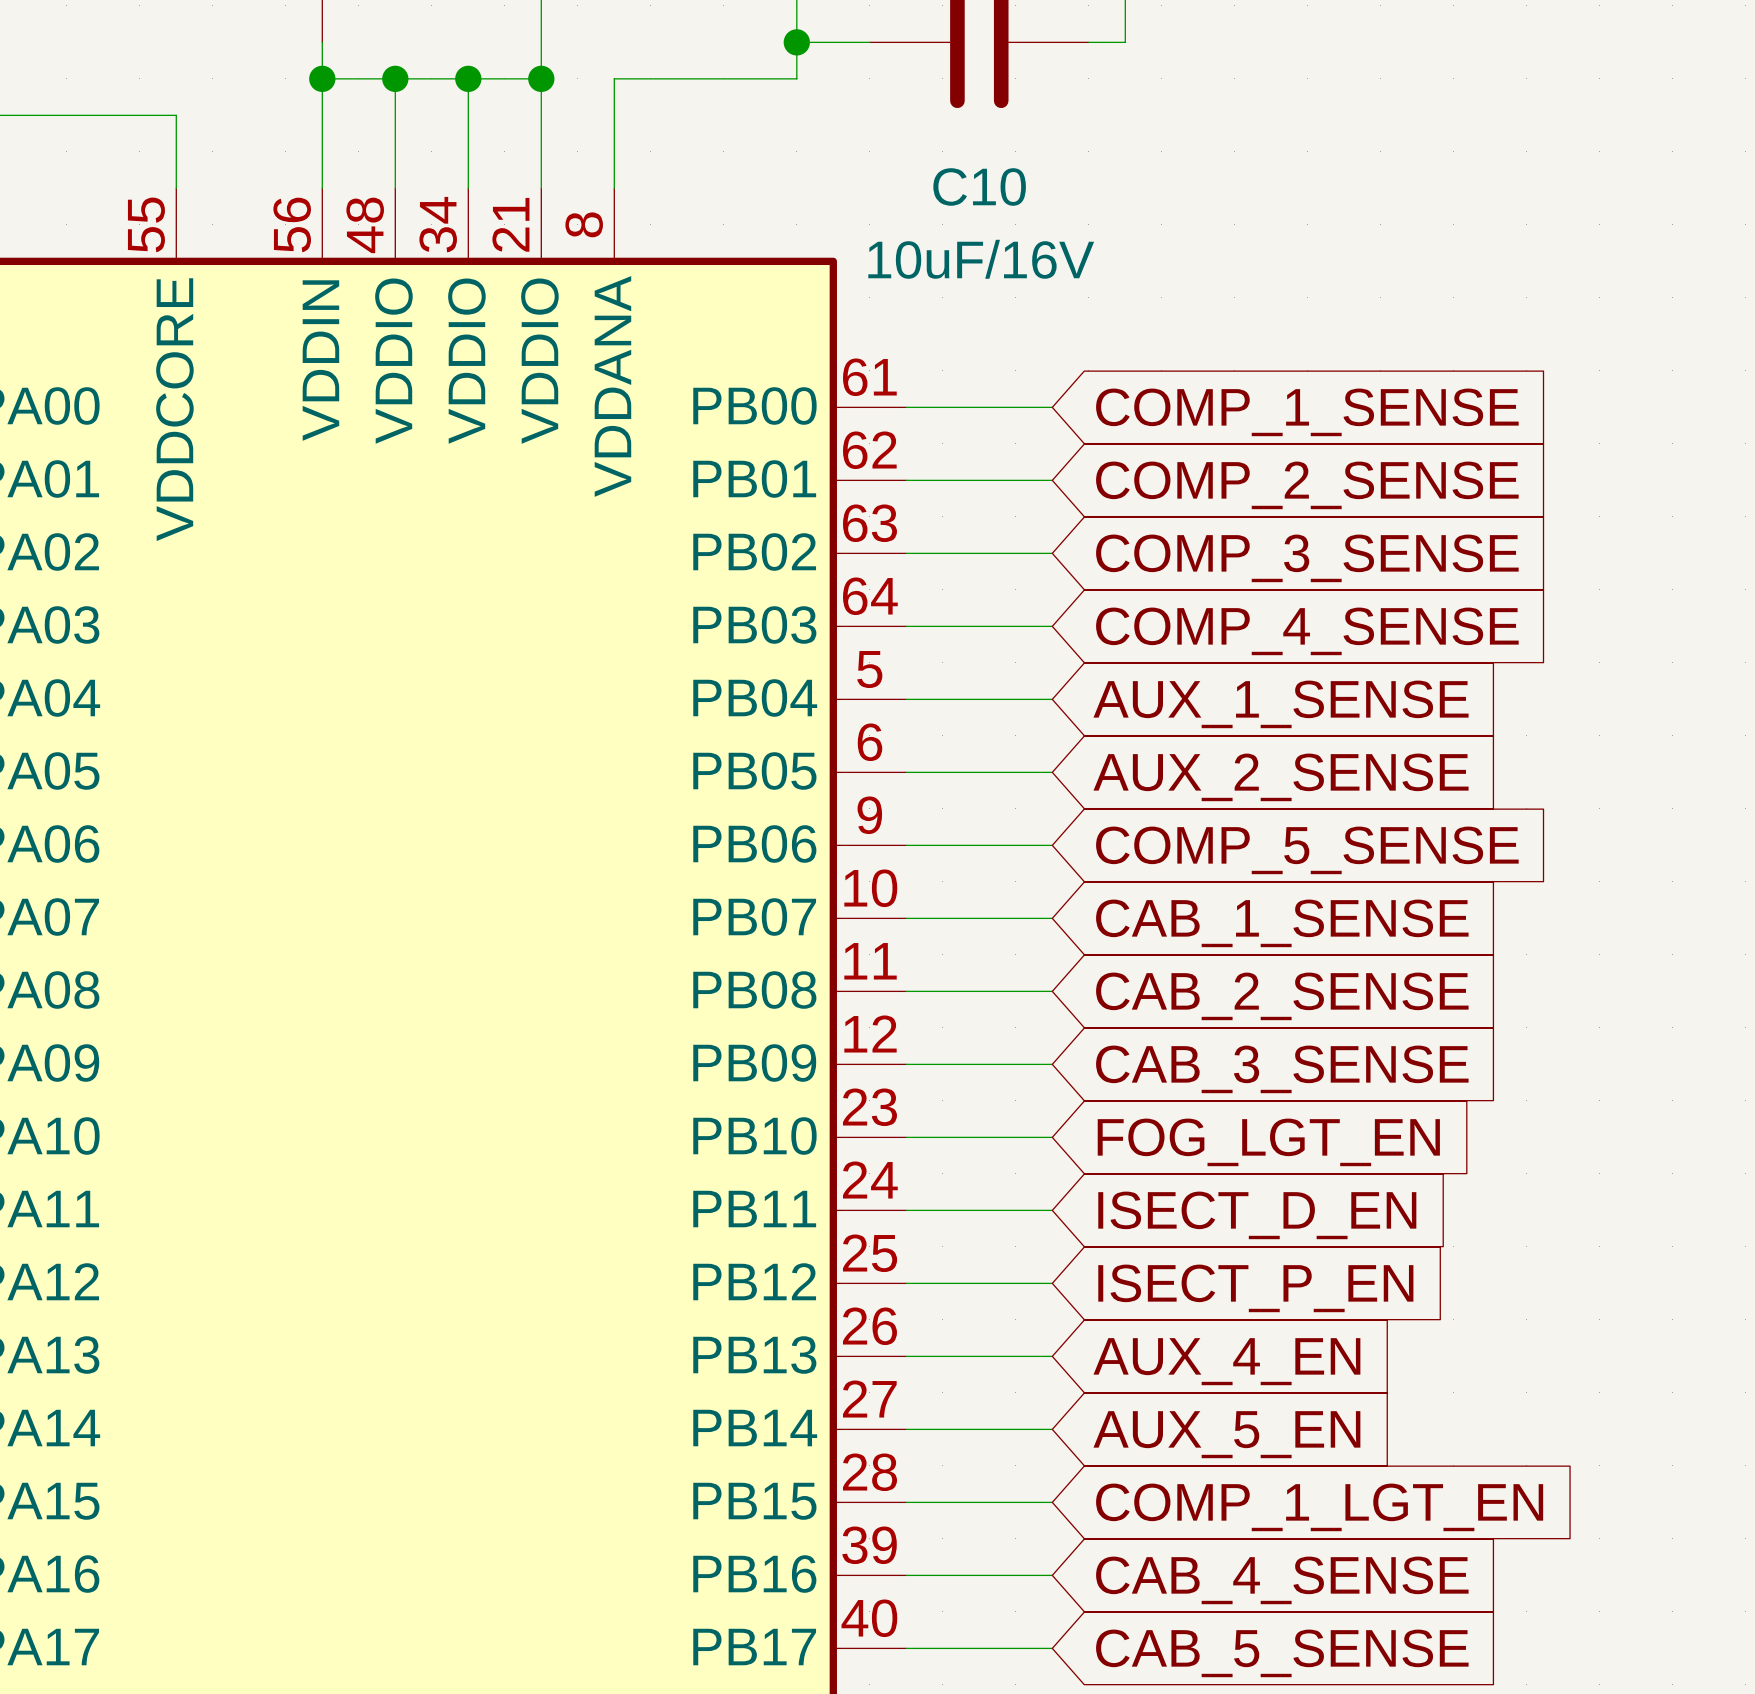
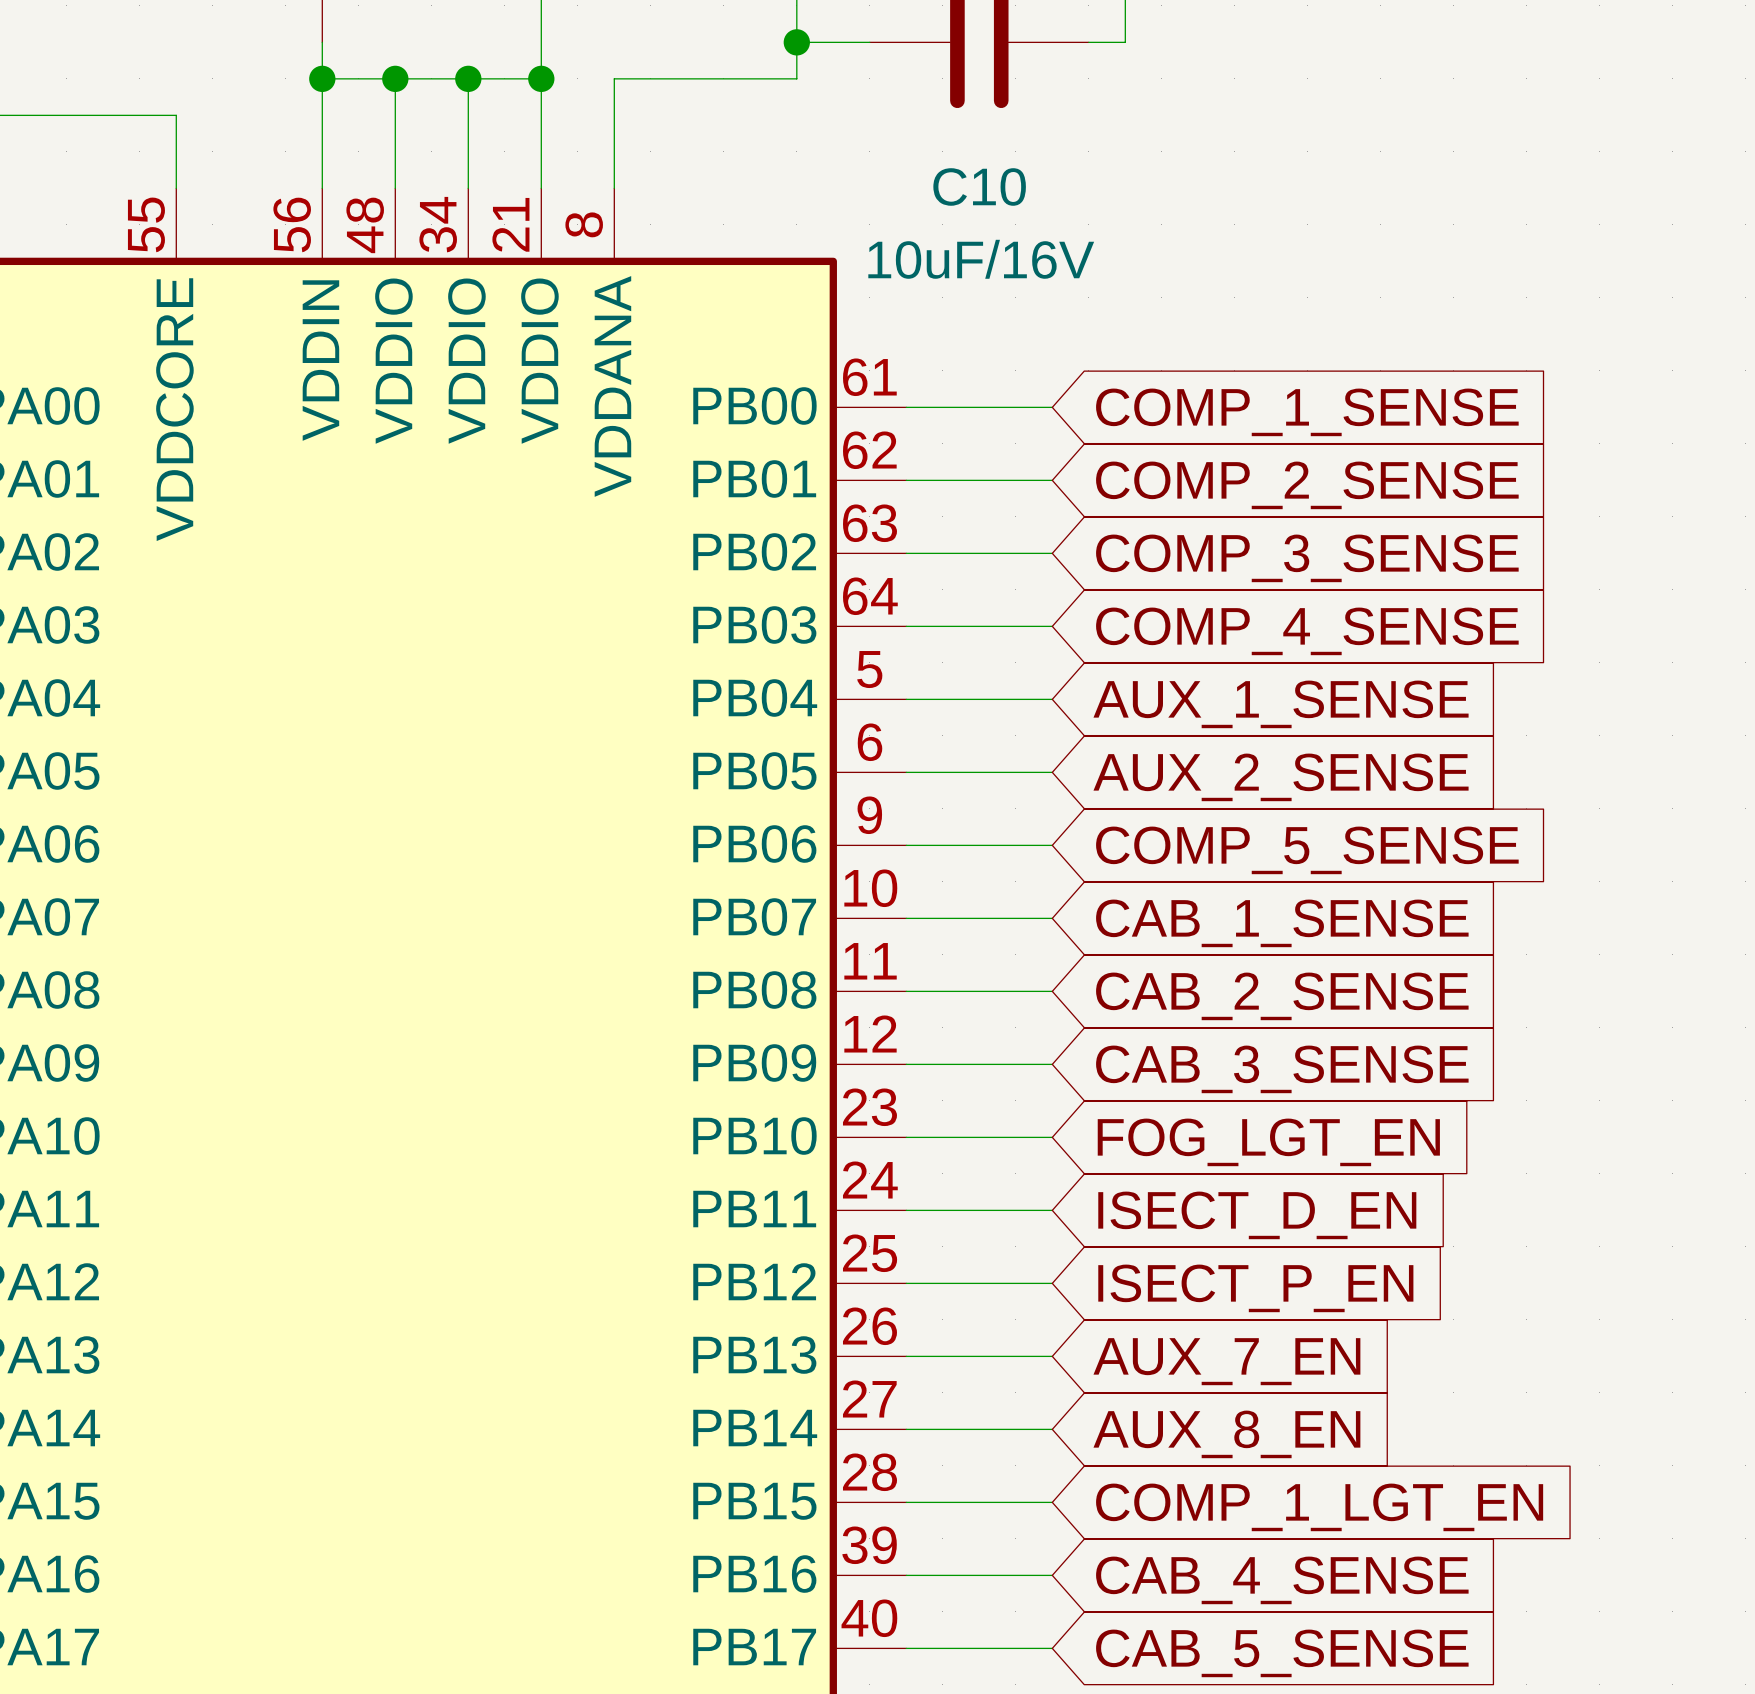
global label: AUX_4_EN (1226, 1361) -> AUX_7_EN (1226, 1361)
global label: AUX_5_EN (1226, 1434) -> AUX_8_EN (1226, 1434)

